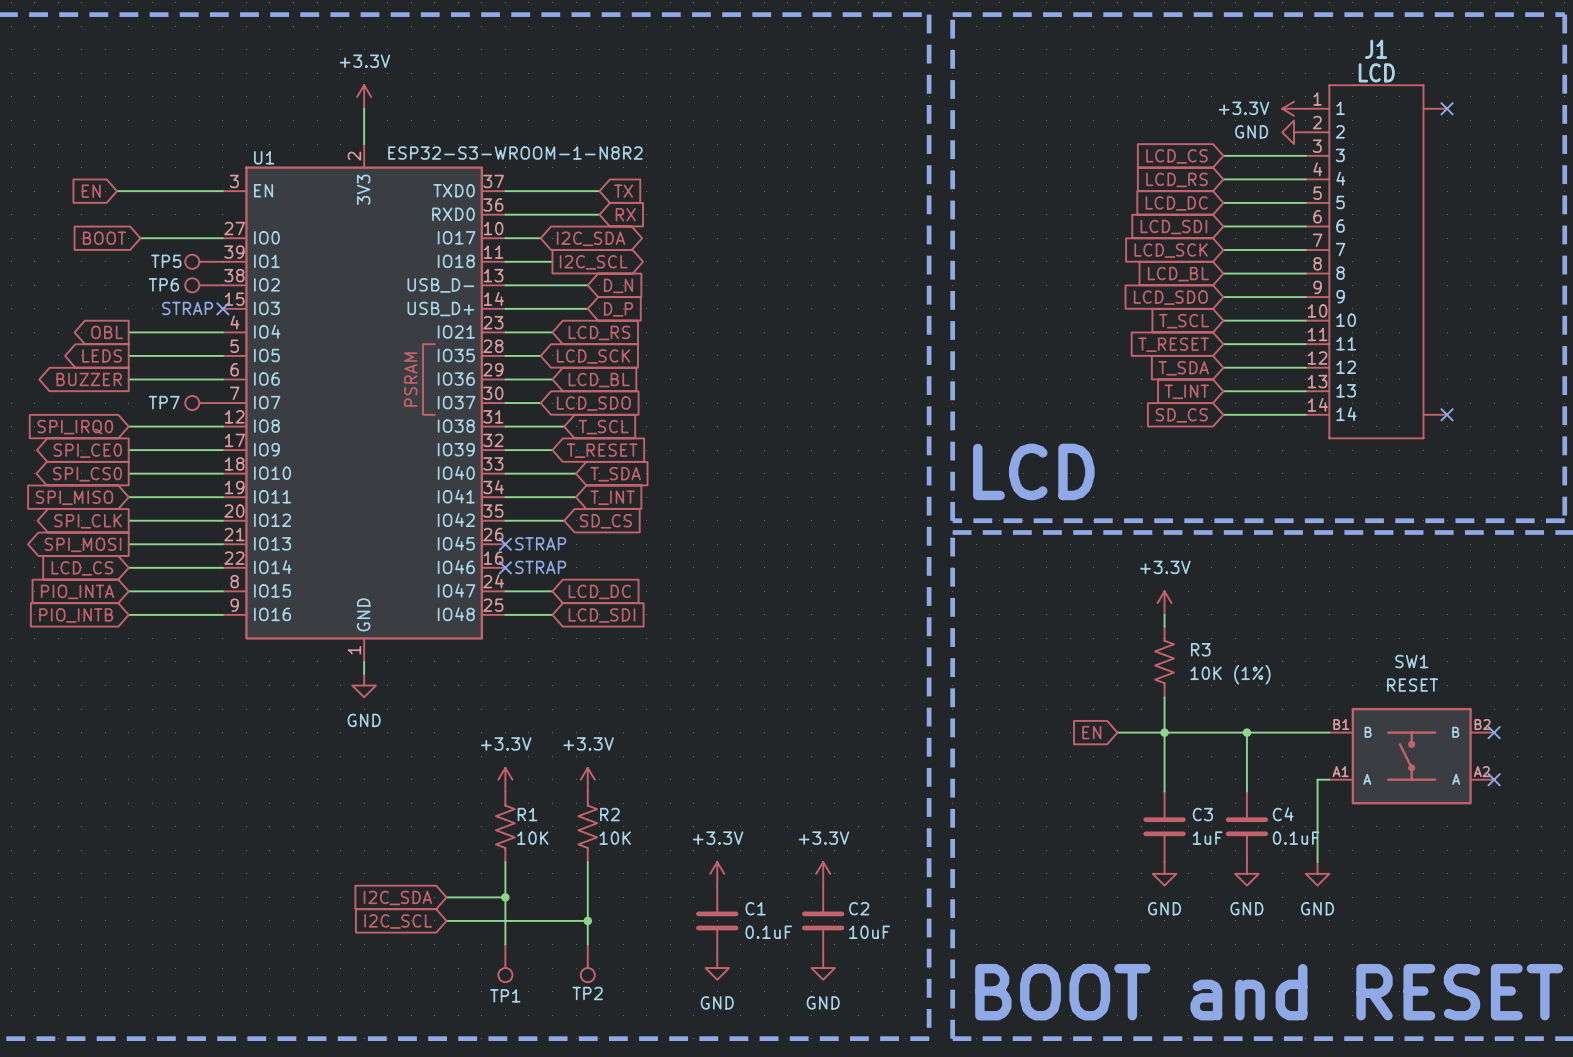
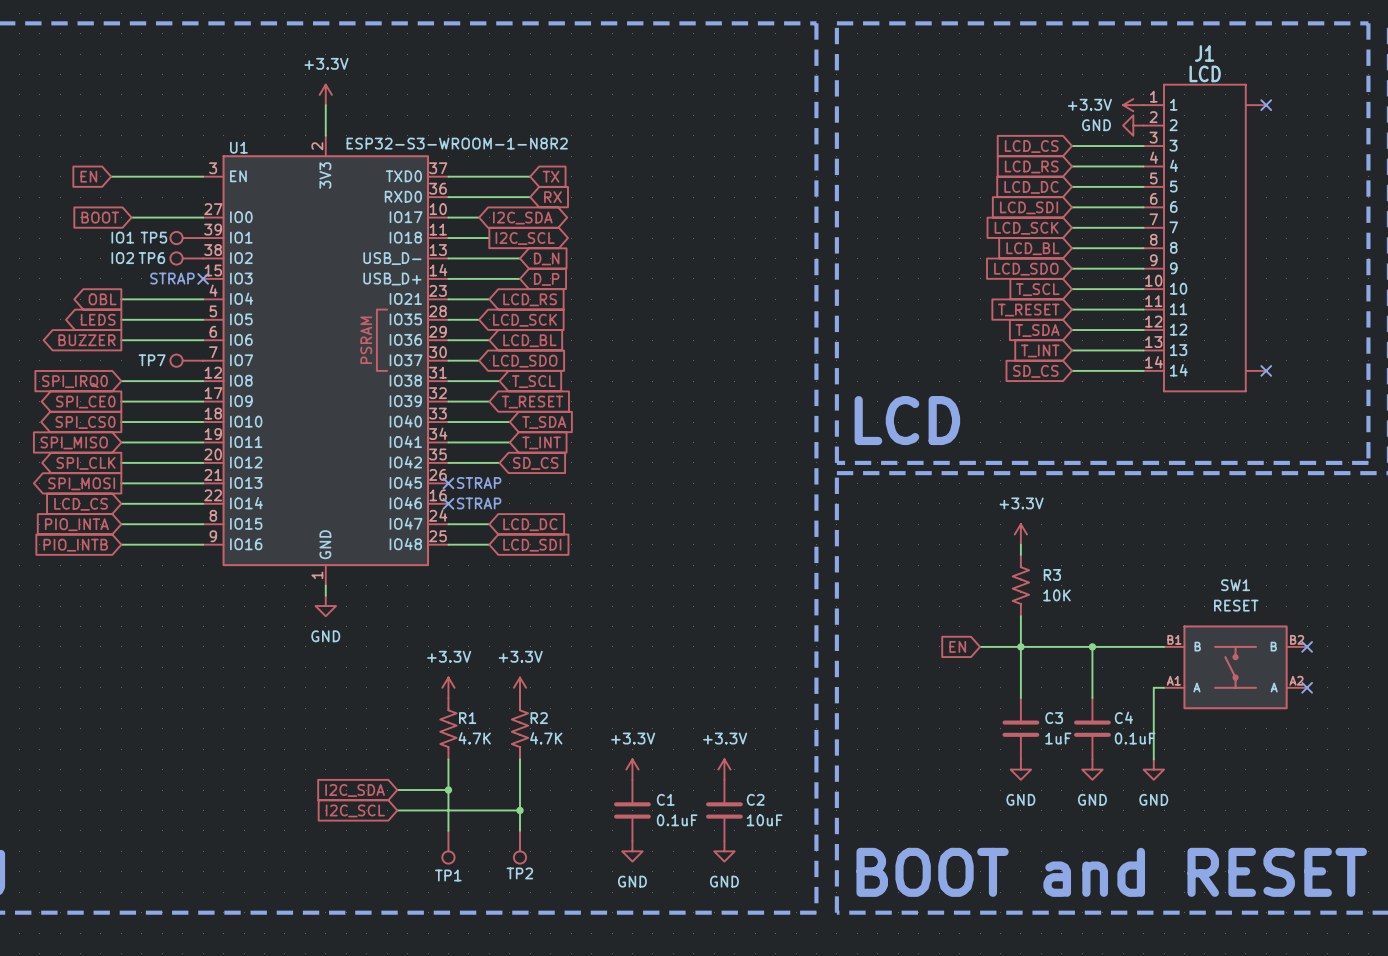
TP5 value: none -> IO1 (122, 237)
TP6 value: none -> IO2 (122, 258)
R3 value: 10K (1%) (1230, 674) -> 10K (1056, 595)
R1 value: 10K (532, 838) -> 4.7K (474, 738)
R2 value: 10K (615, 838) -> 4.7K (546, 738)

